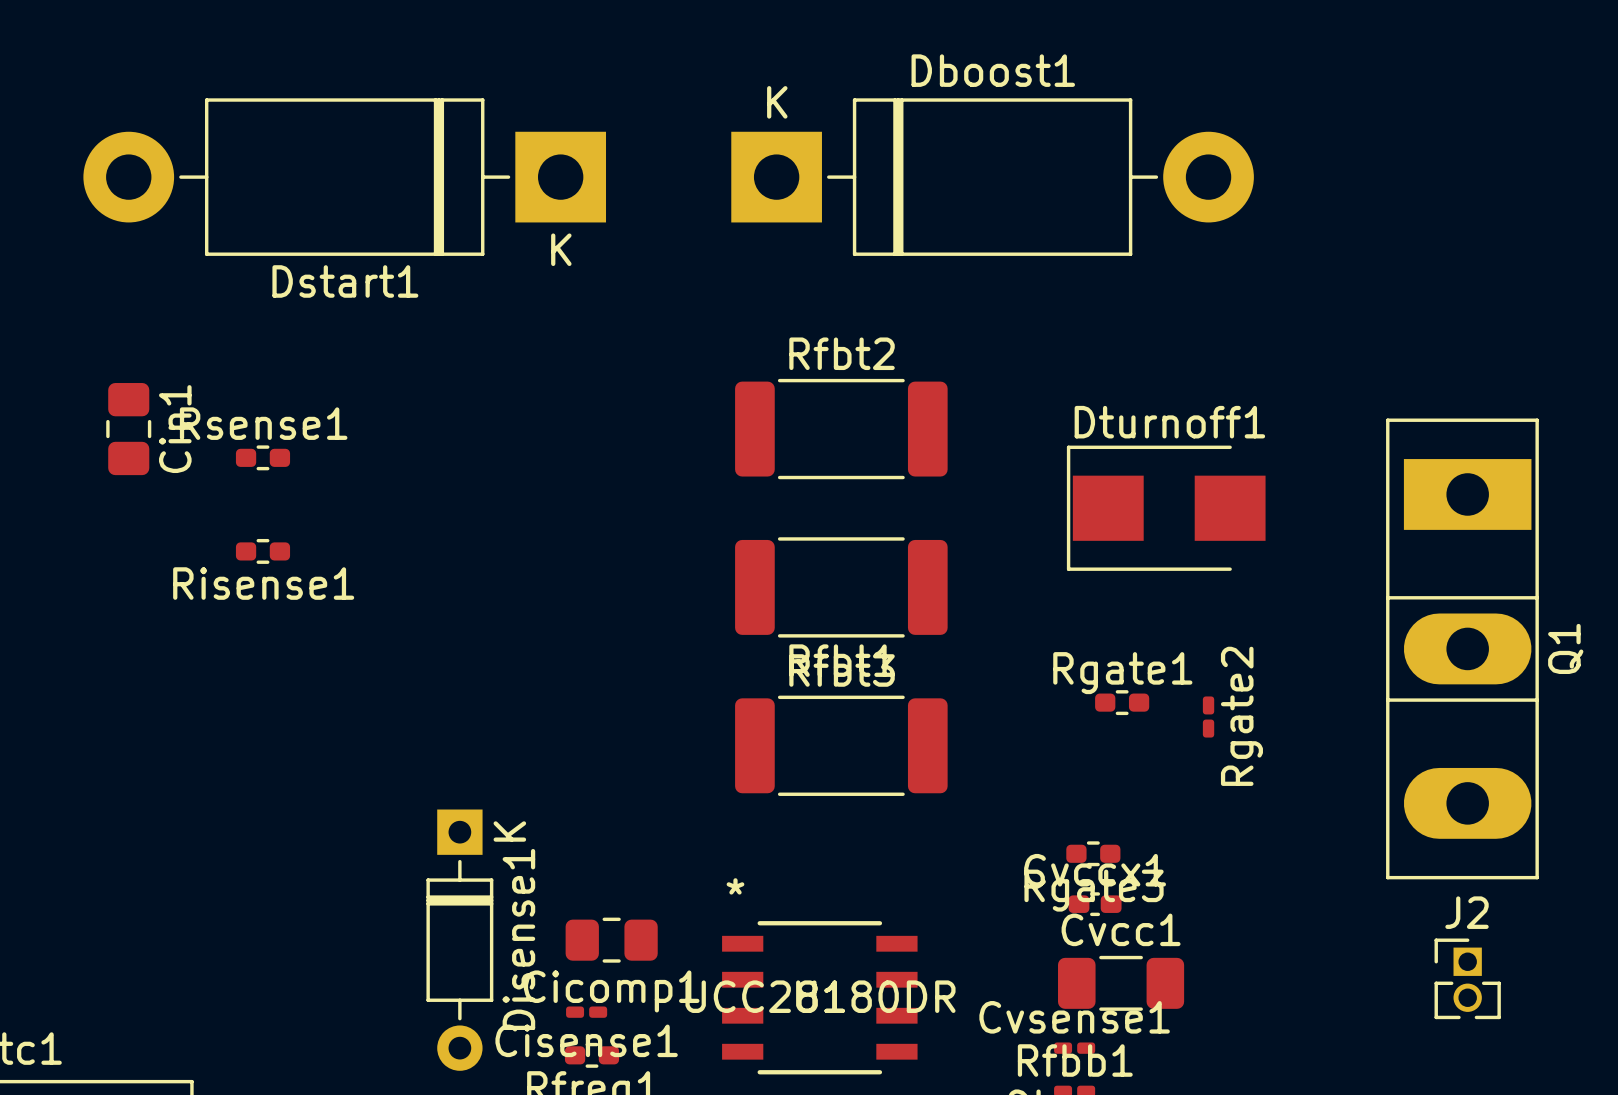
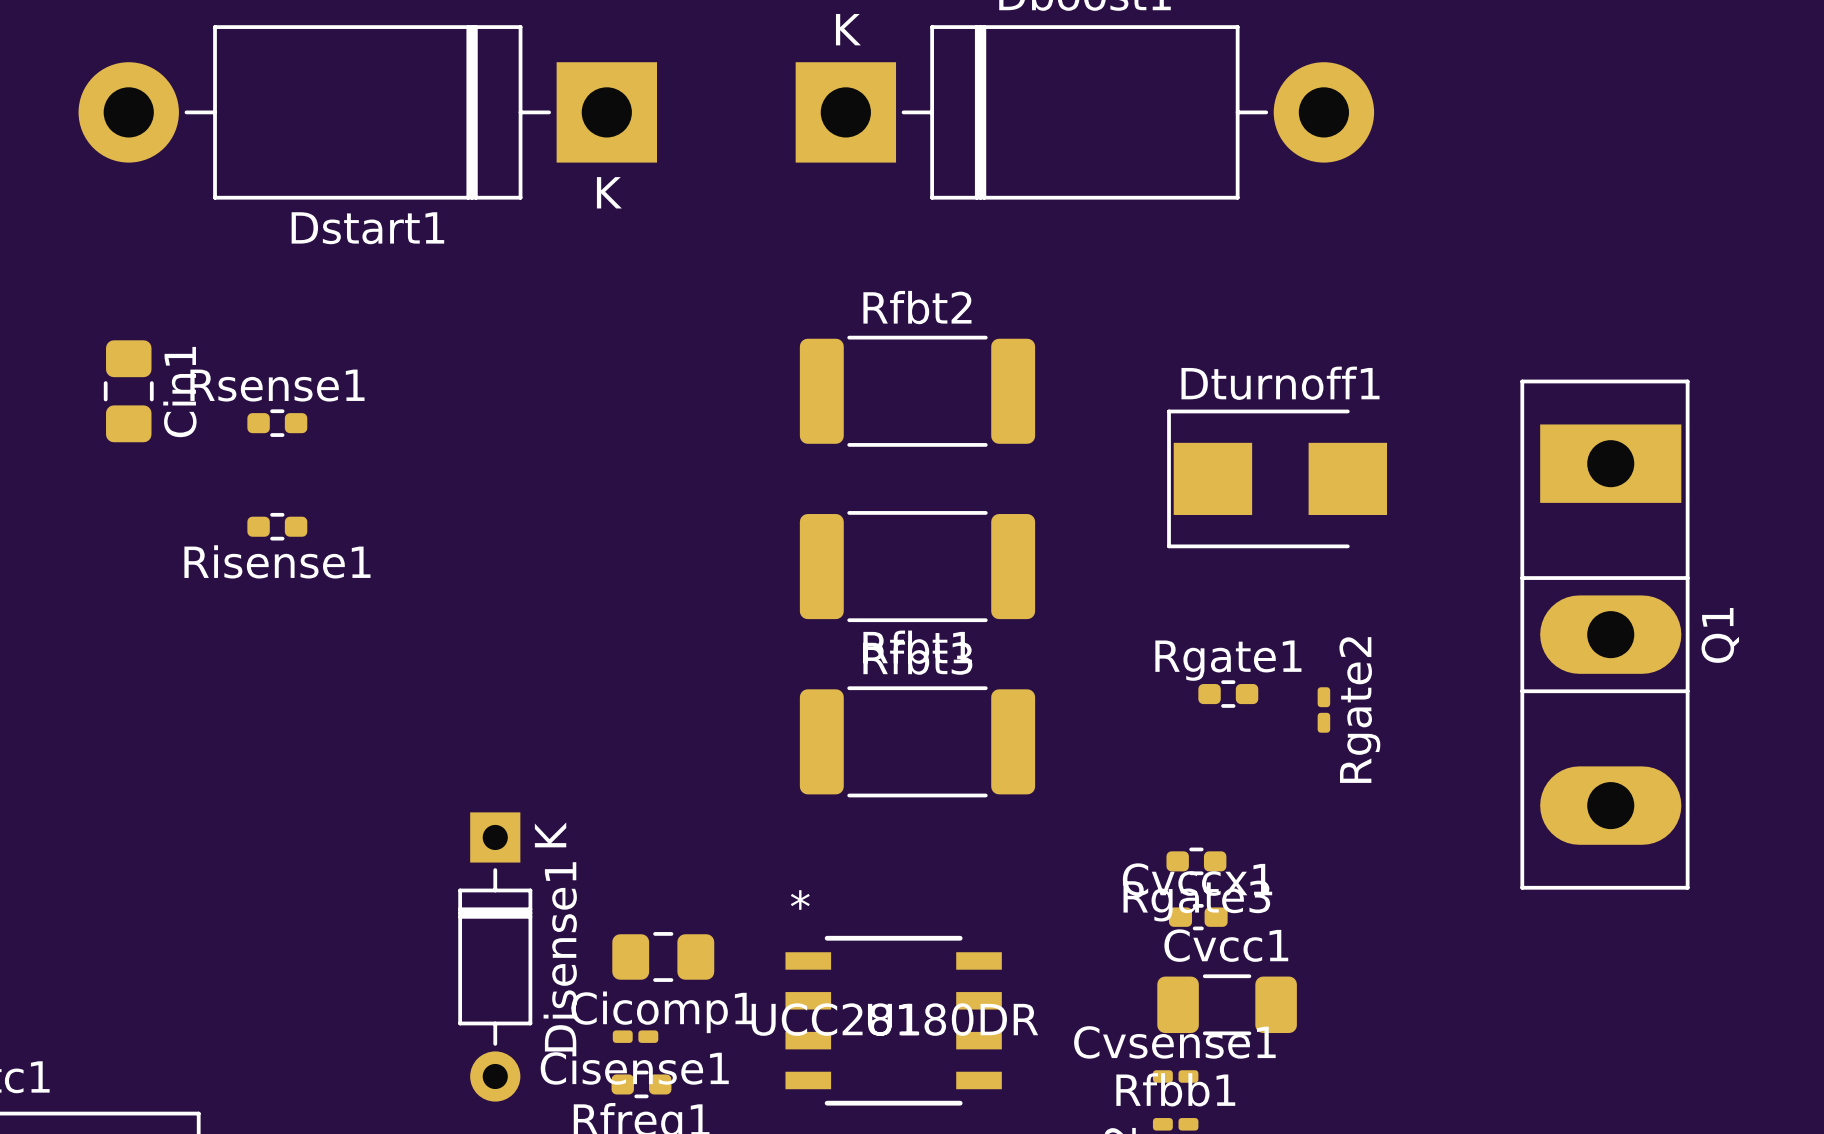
J2: (1467, 978) -> none

